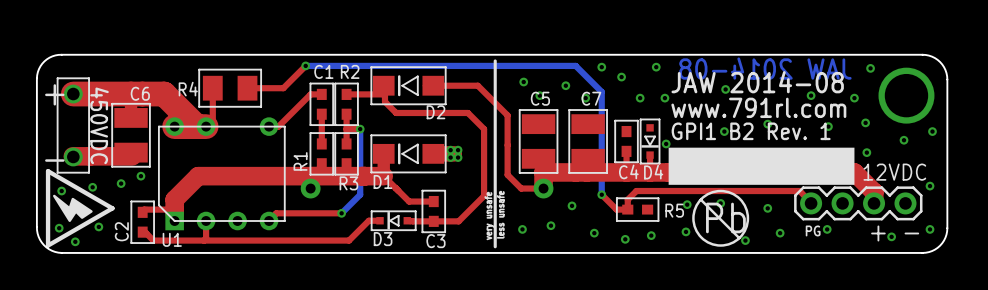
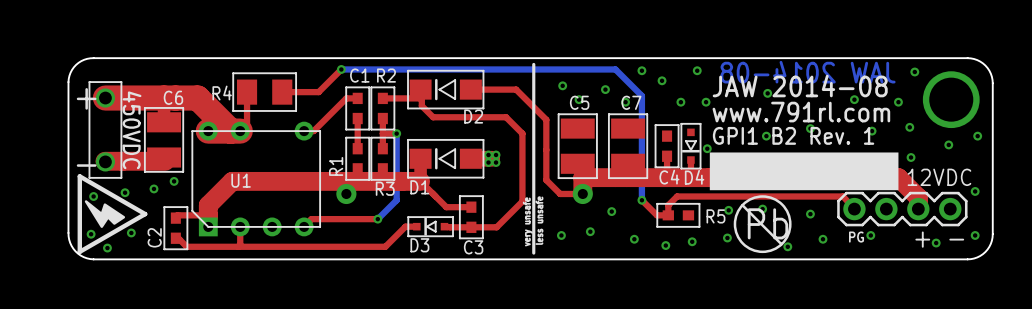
U1 name position: U1 (172, 239) -> U1 (241, 180)

